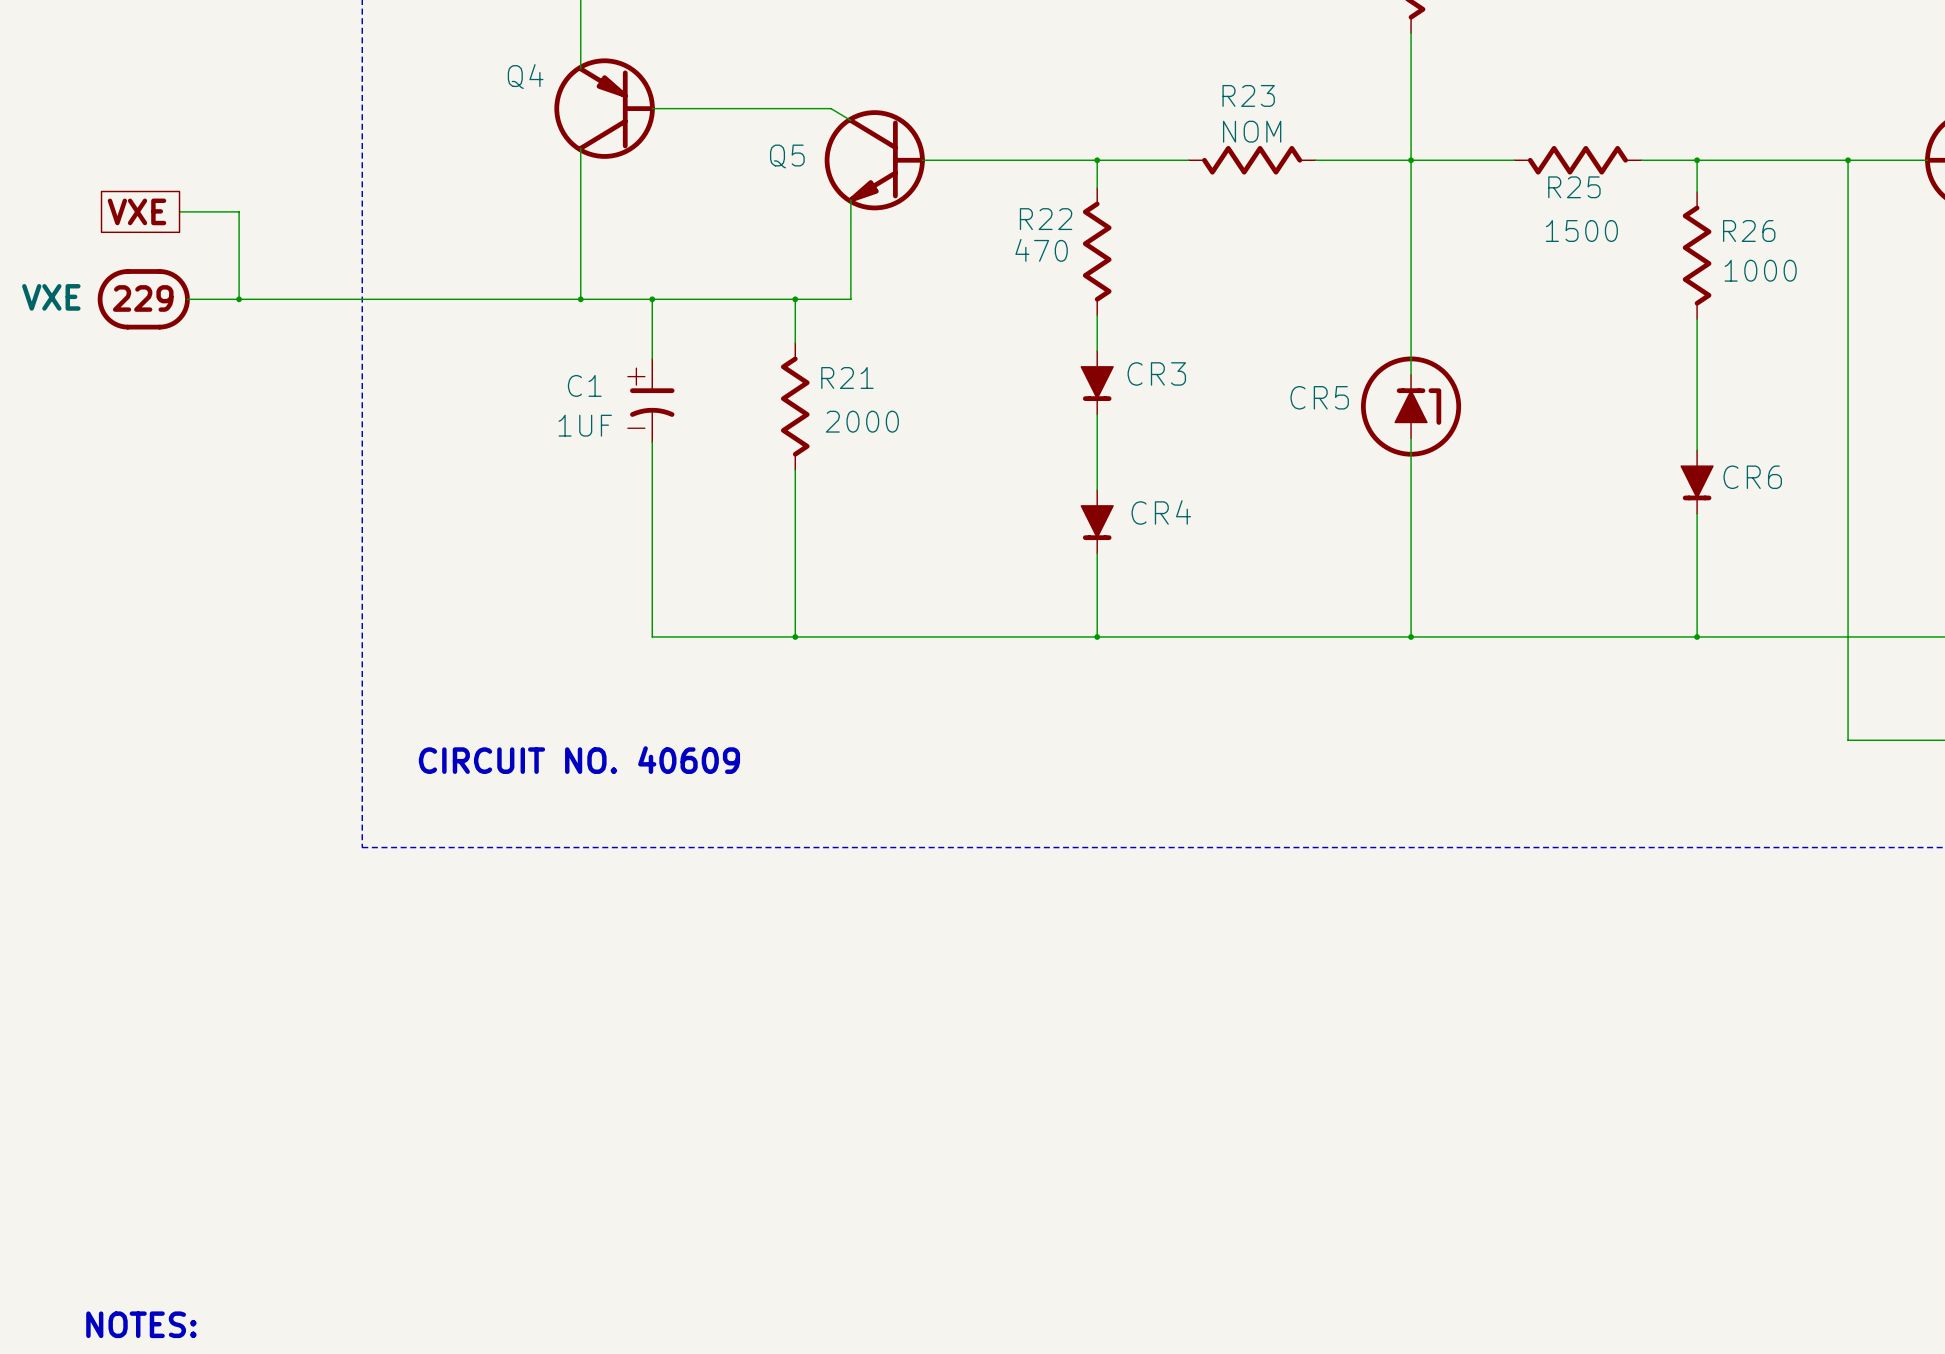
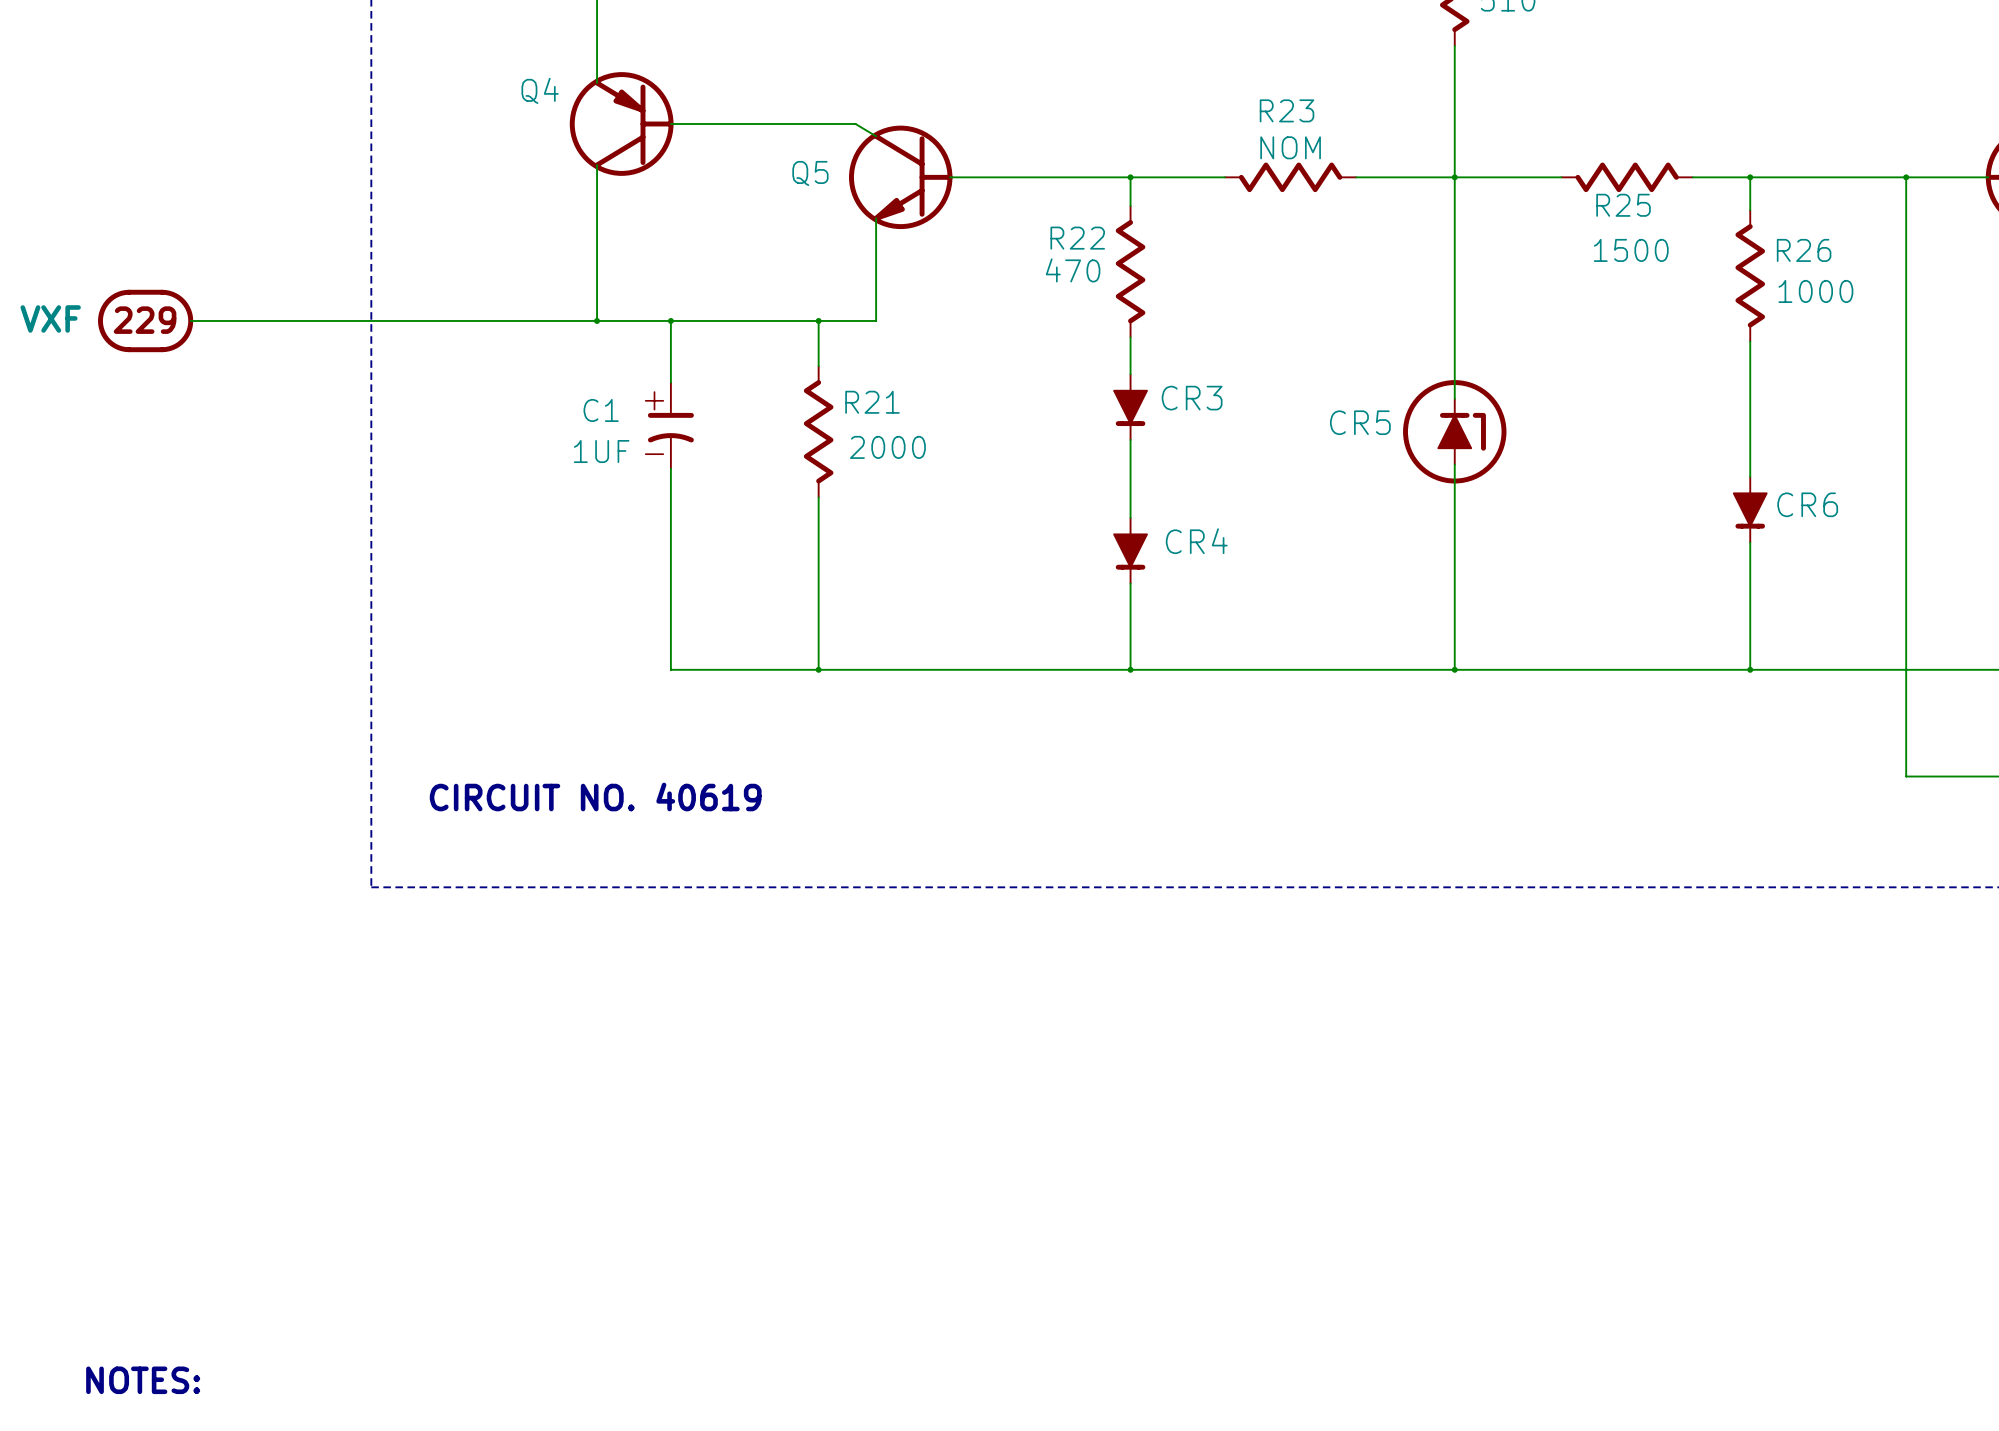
global label: VXE (136, 211) -> none
wire: (179, 211) (239, 211) (239, 299) -> none
part text: VXE (51, 297) -> VXF (50, 318)
junction: (239, 299) -> none
text: CIRCUIT NO. 40609 (579, 760) -> CIRCUIT NO. 40619 (595, 796)

